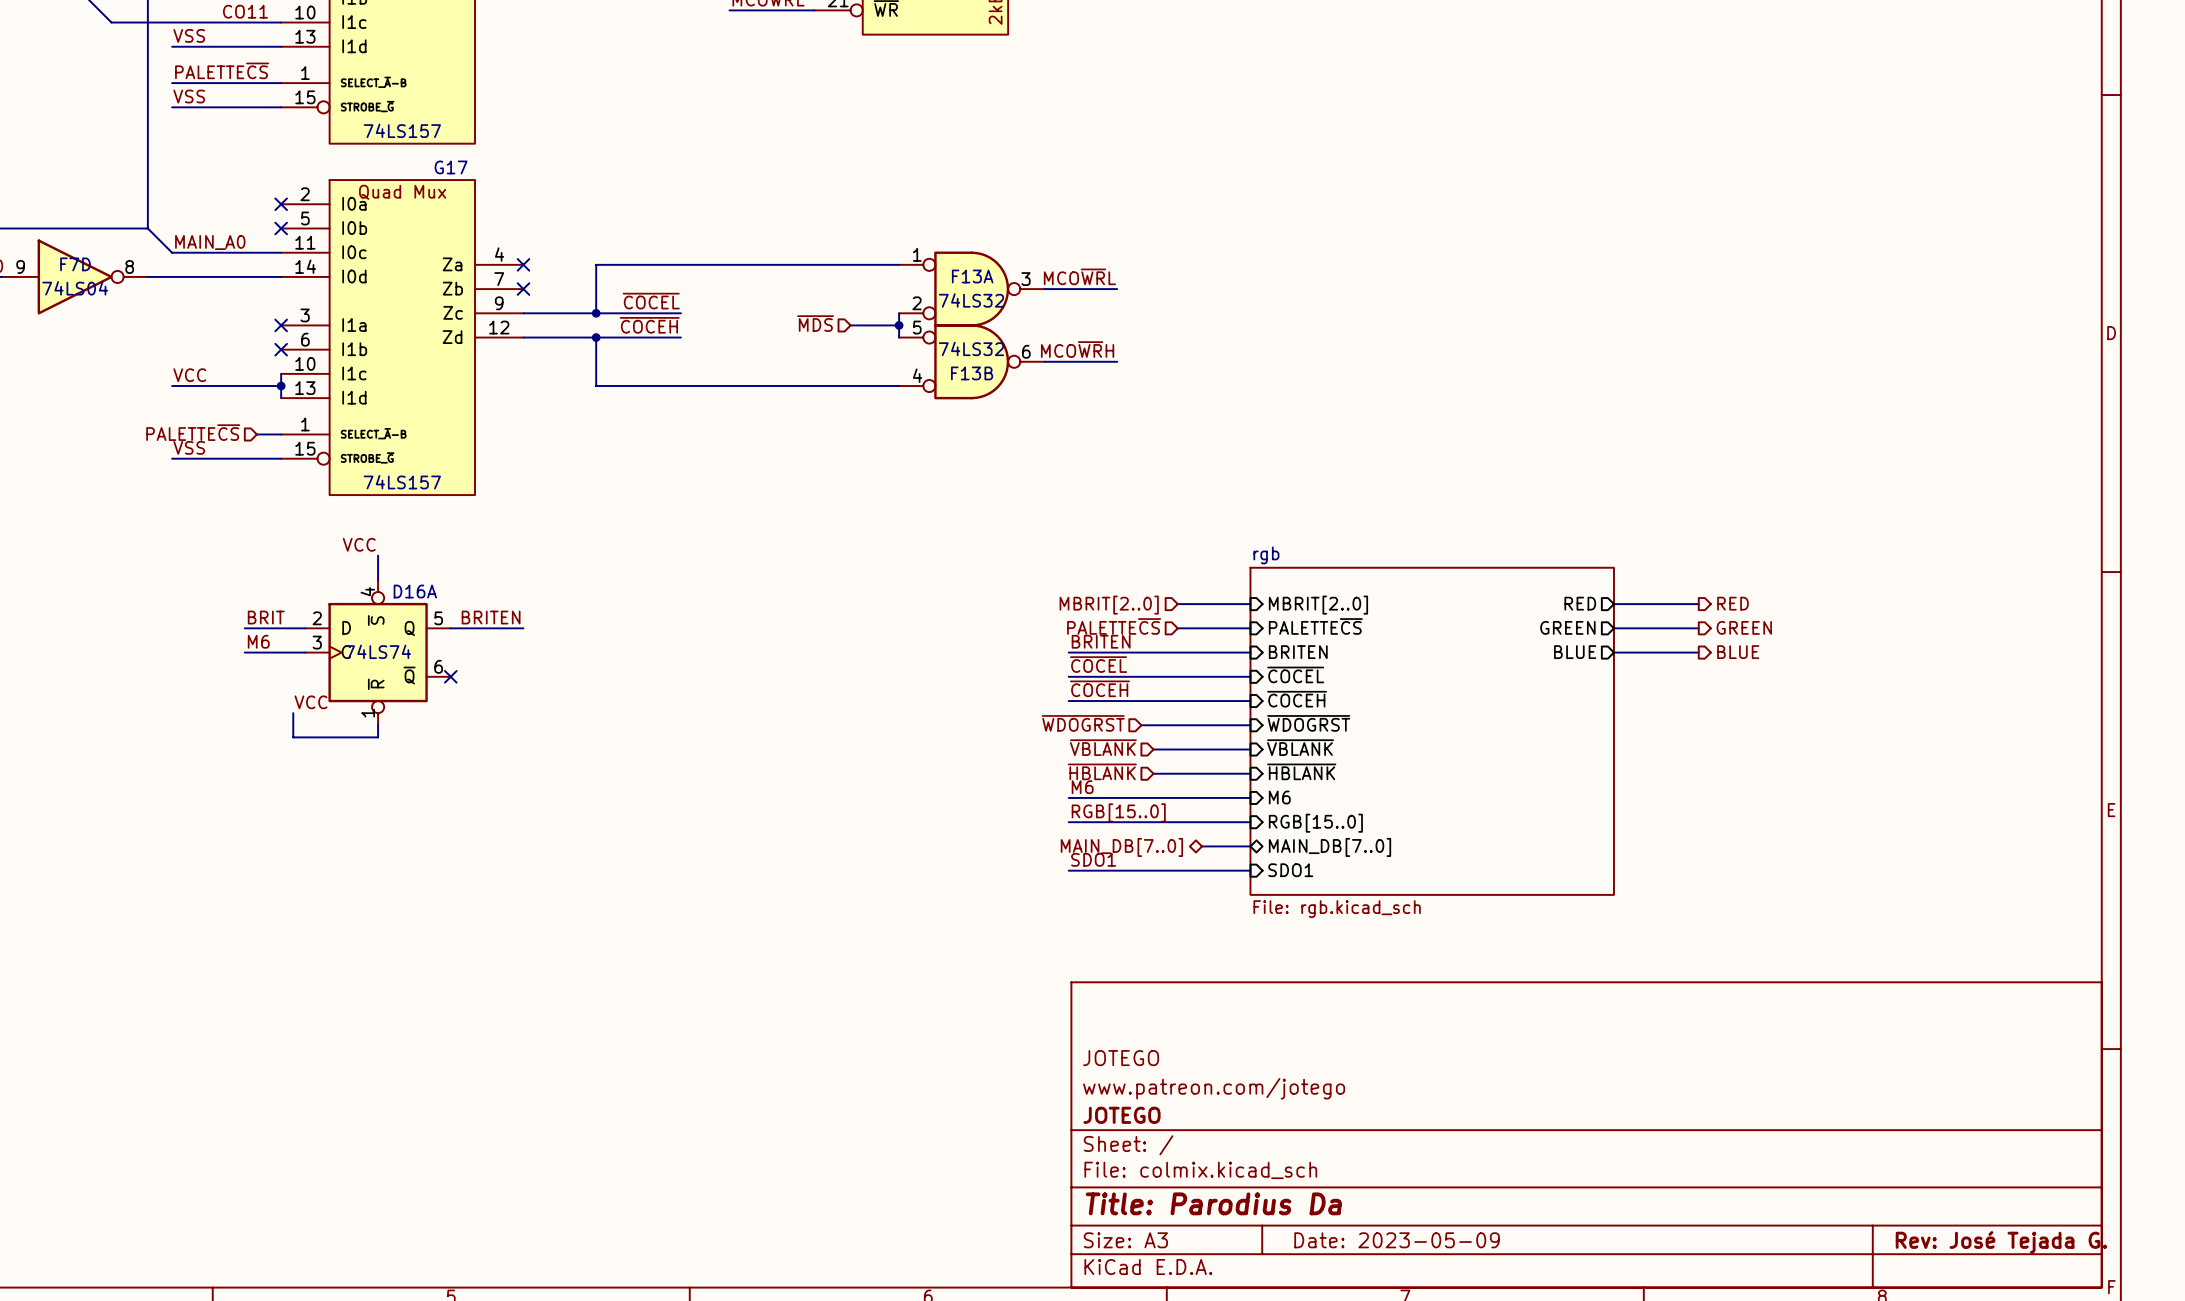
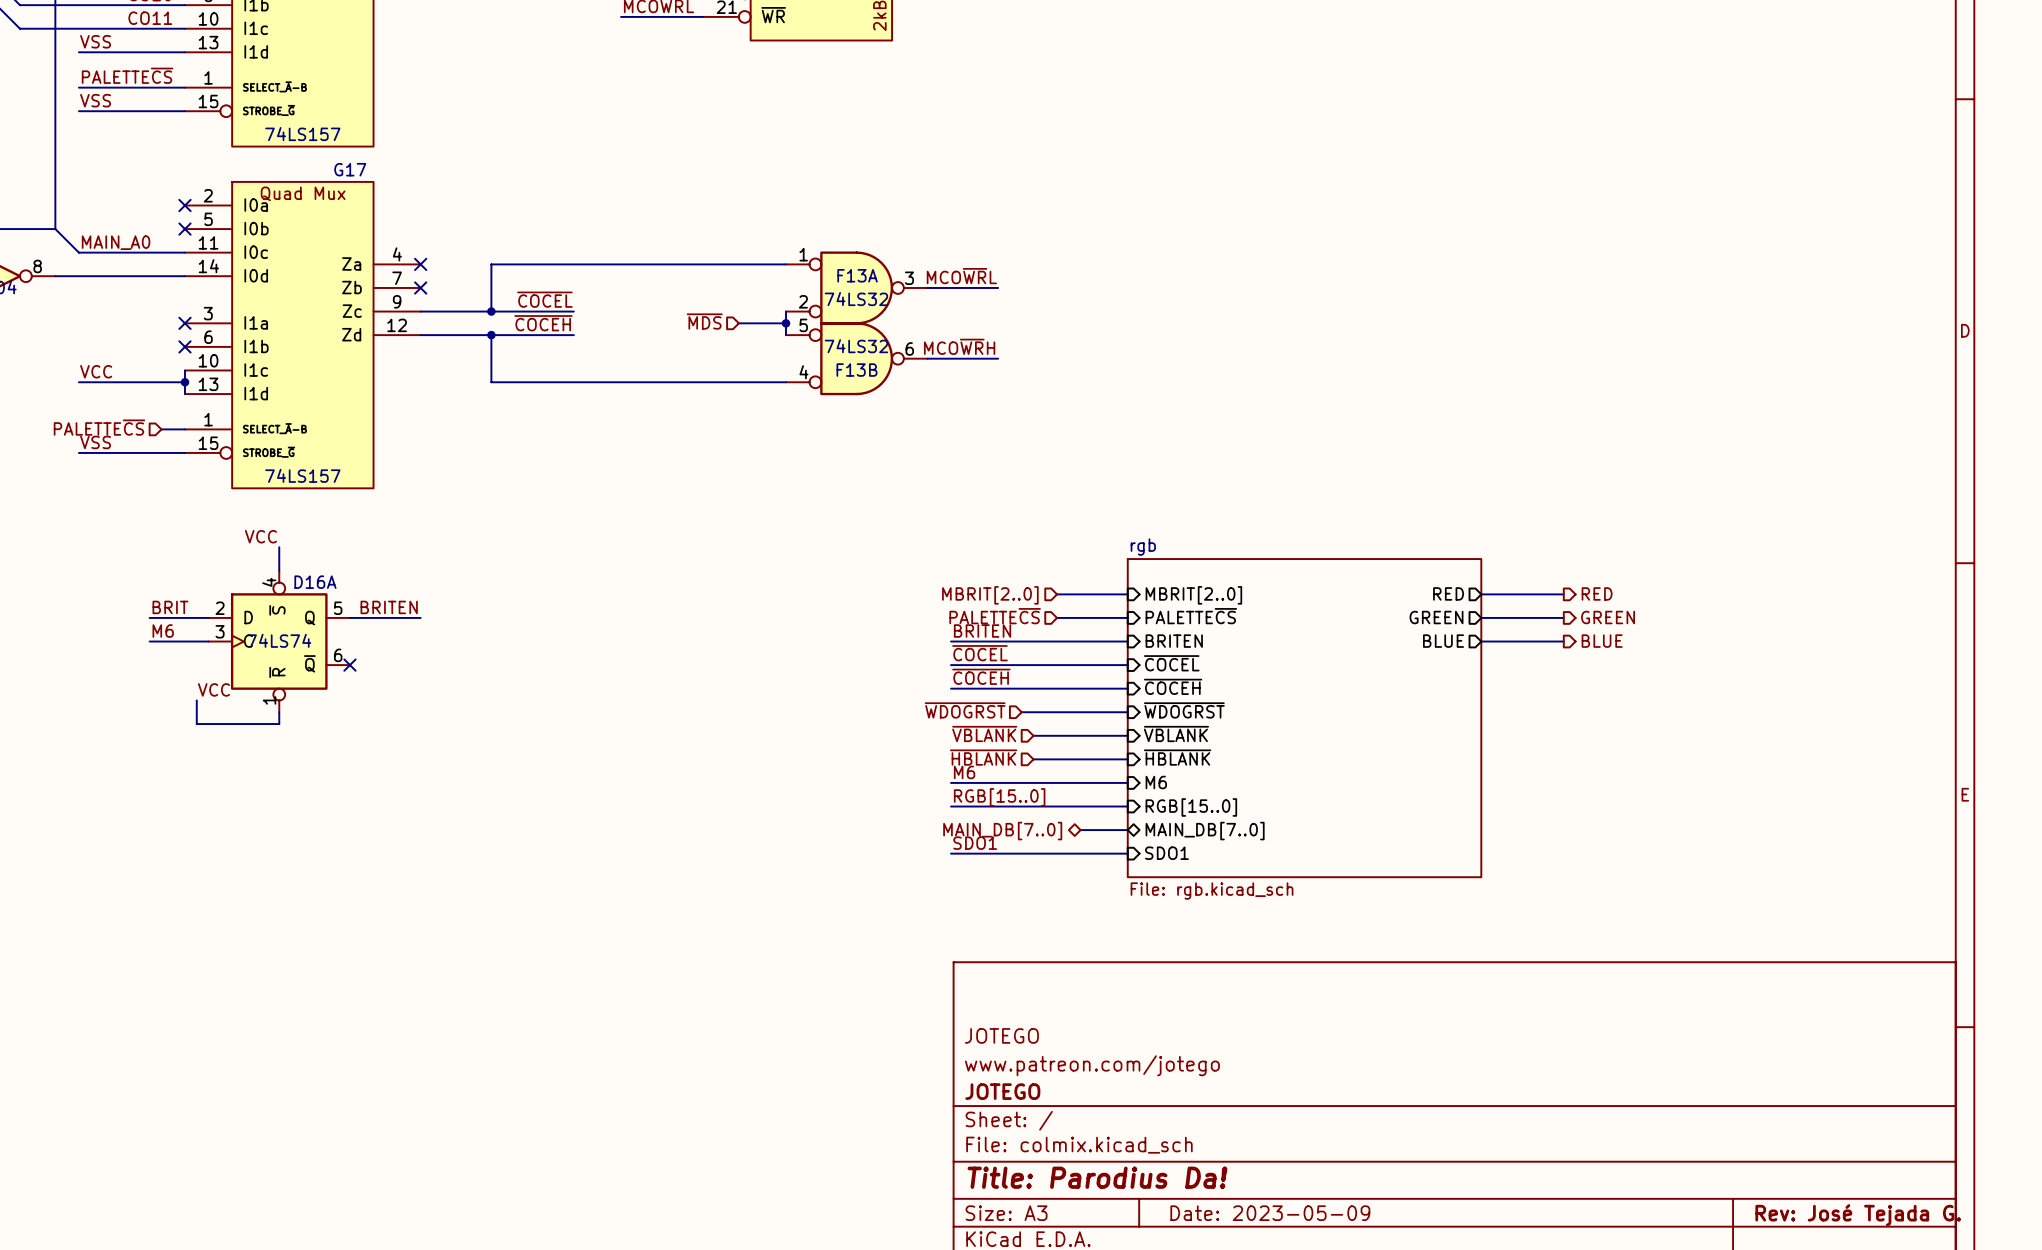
title block: Title: Parodius Da (1213, 1203) -> Title: Parodius Da! (1097, 1177)

